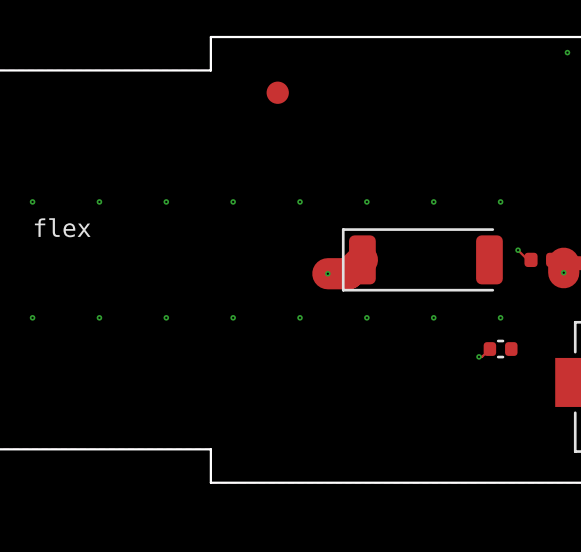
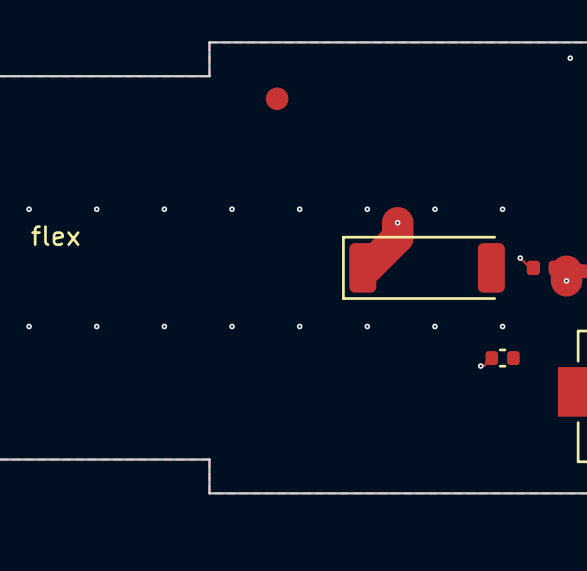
top track: none -> (397, 222) (397, 237) (367, 267)
top track: (362, 259) (348, 273) (327, 273) -> none
via position: (327, 273) -> (397, 222)

